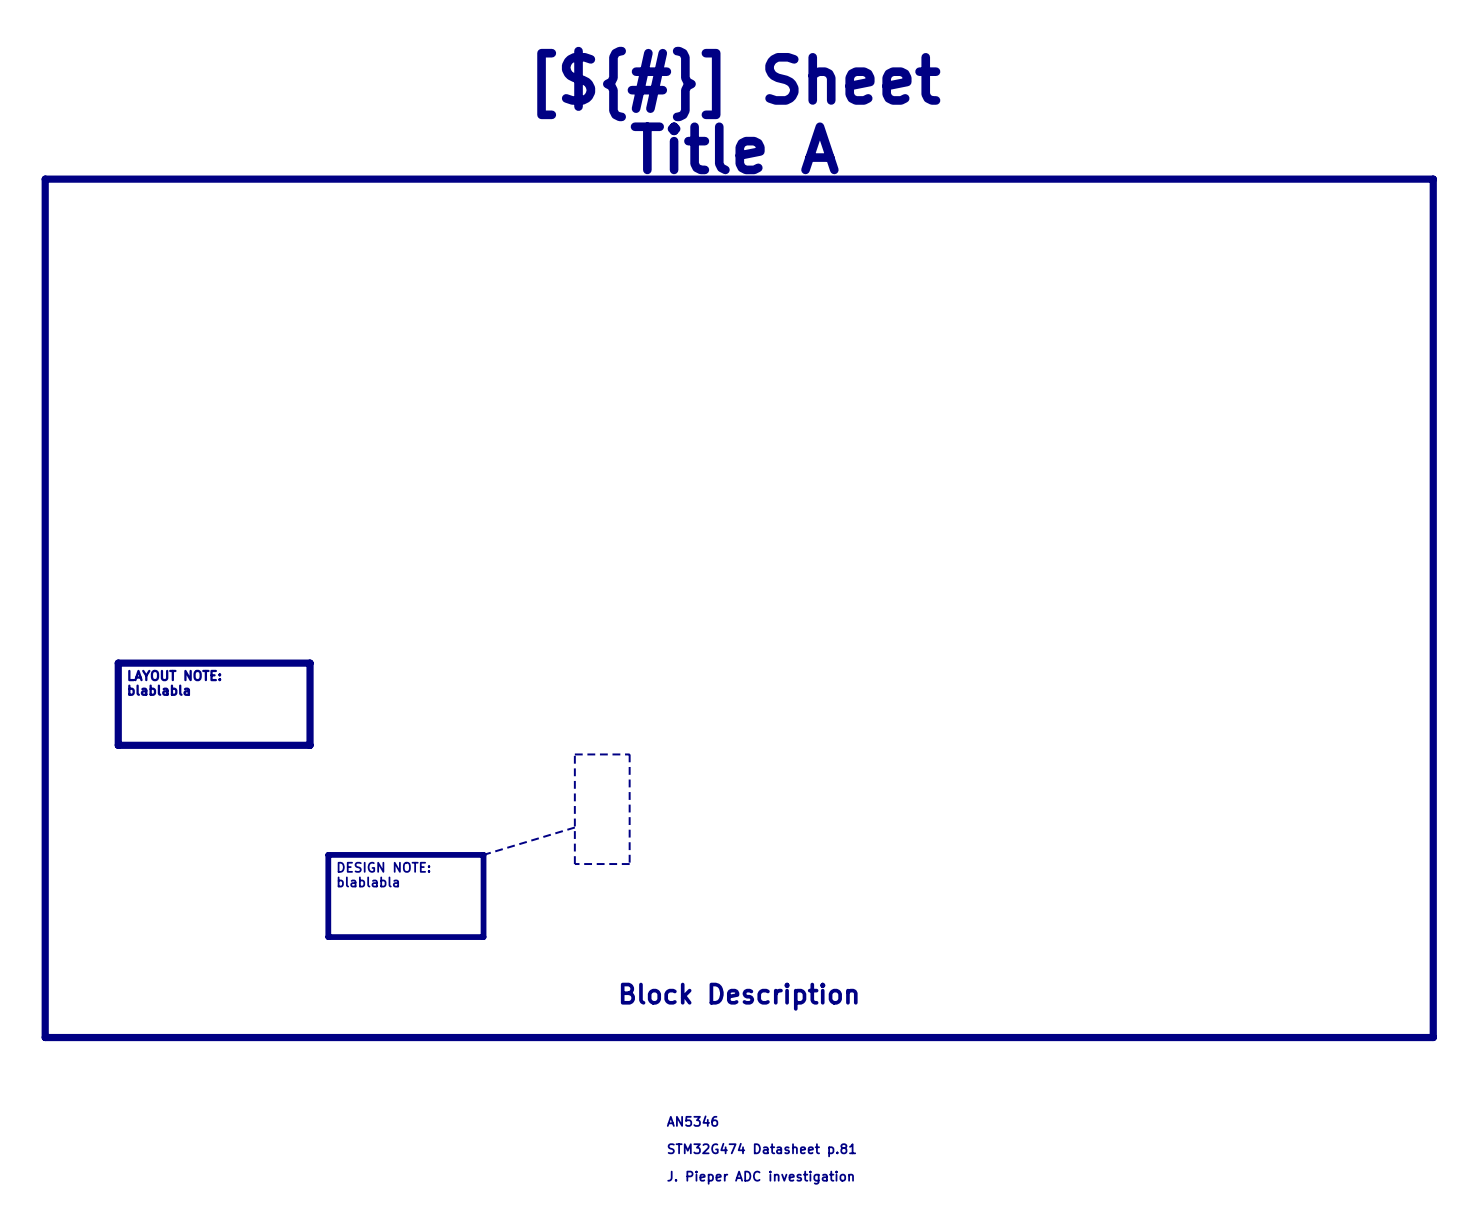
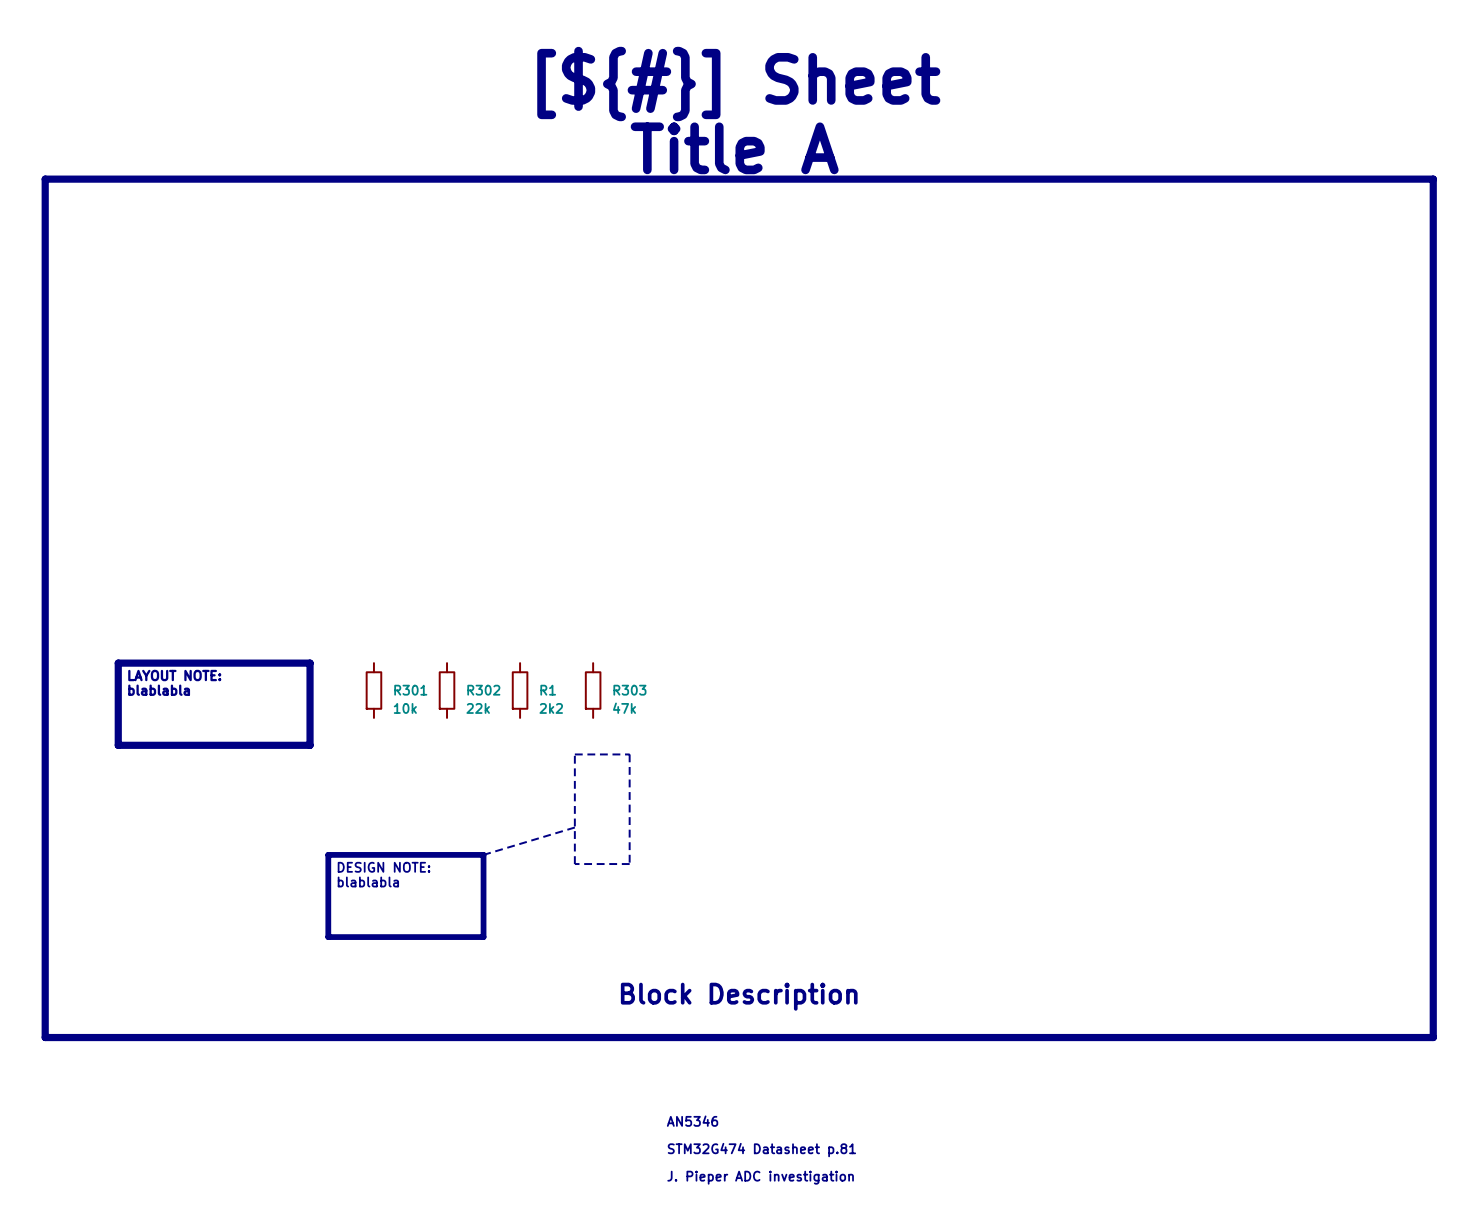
R301: none -> 10k (373, 690)
R302: none -> 22k (447, 690)
R1: none -> 2k2 (520, 690)
R303: none -> 47k (593, 690)

